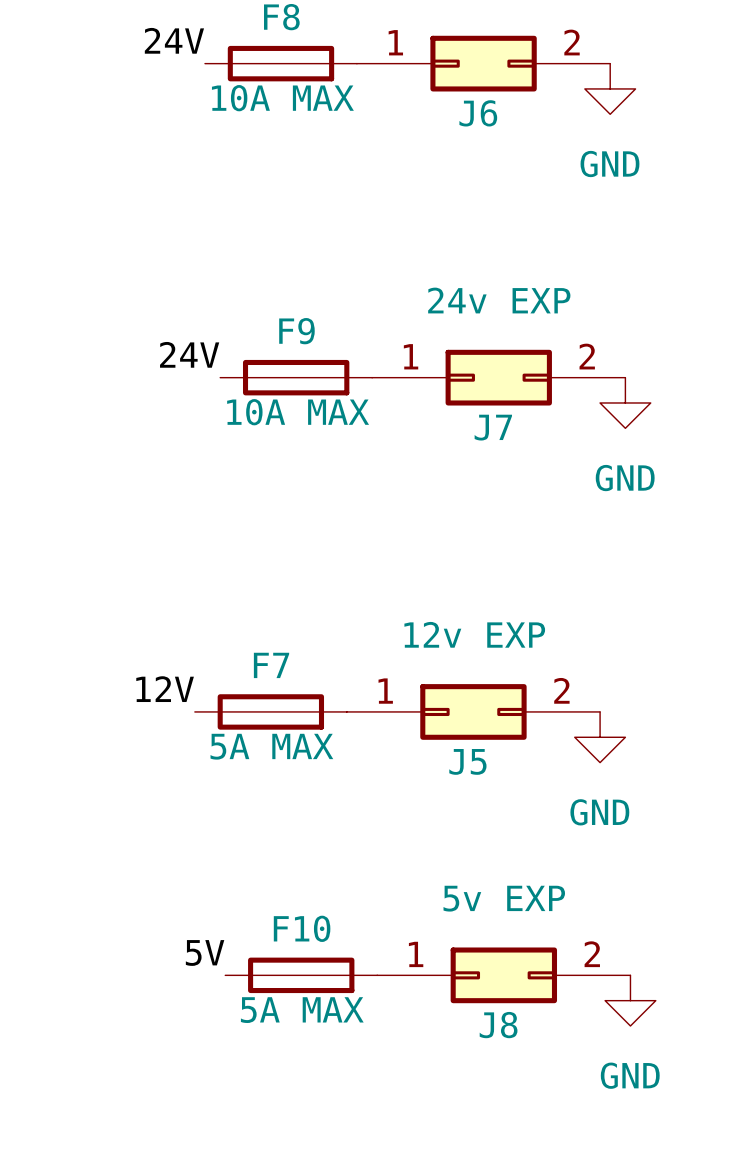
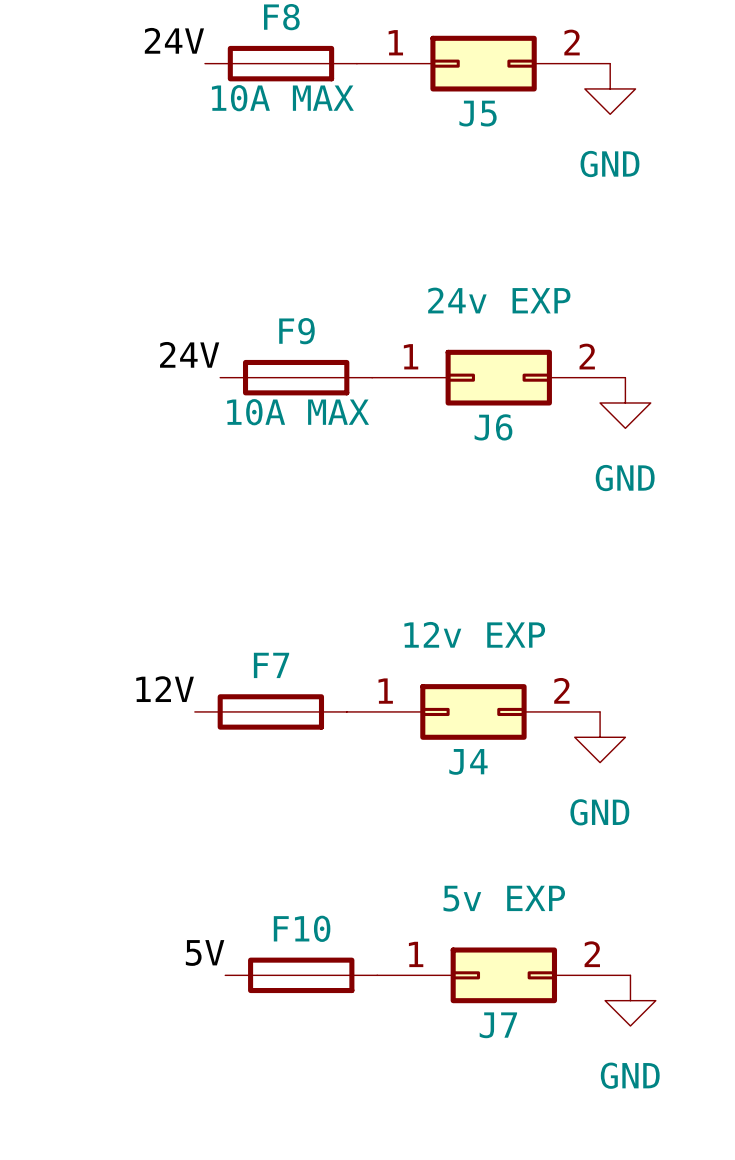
J6 name: J6 (478, 113) -> J5 (478, 113)
J7 name: J7 (493, 427) -> J6 (493, 427)
F7 value: 5A MAX (271, 746) -> none
J5 name: J5 (467, 761) -> J4 (468, 761)
F10 value: 5A MAX (302, 1010) -> none
J8 name: J8 (498, 1025) -> J7 (498, 1025)

